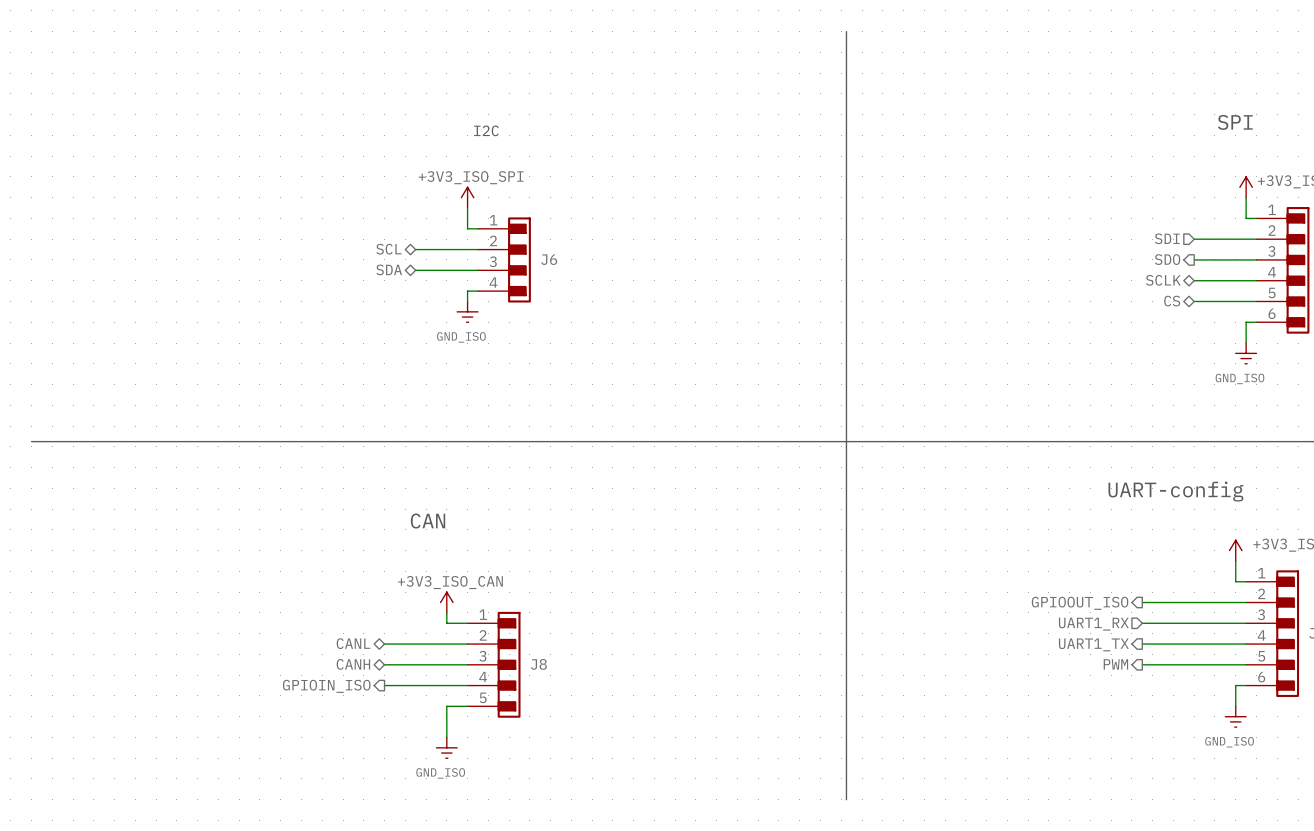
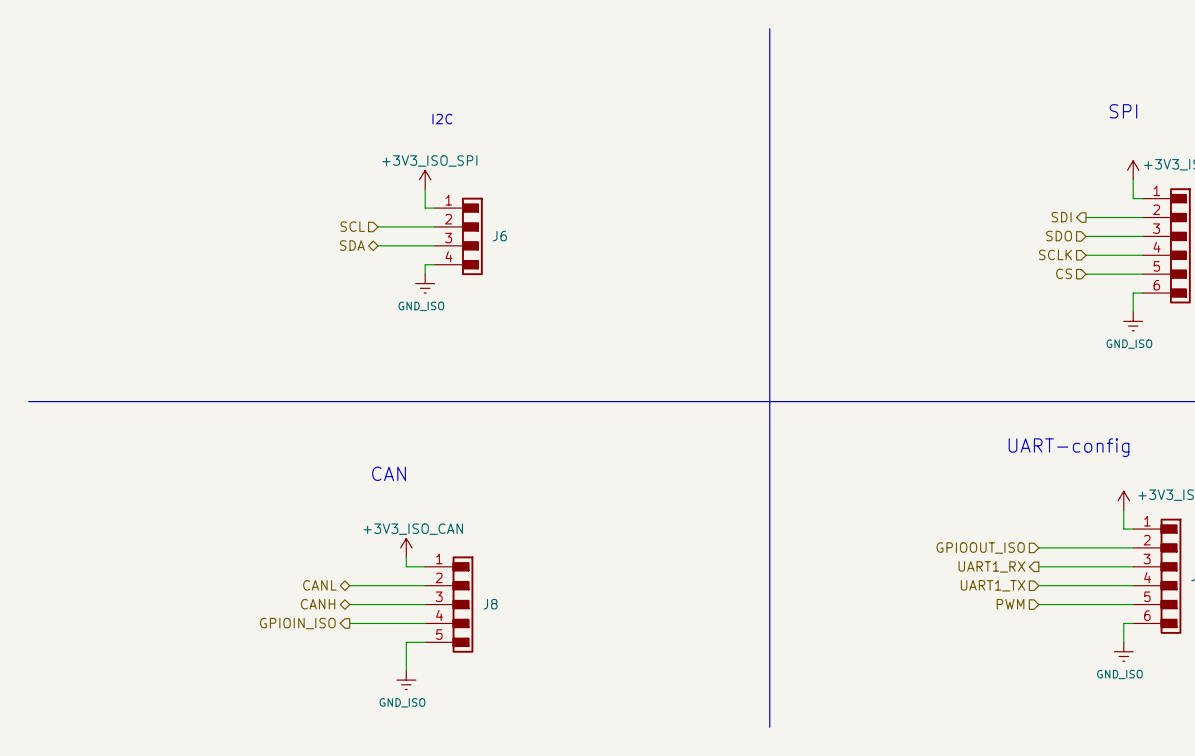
hierarchical label shape: input (1167, 238) -> output (1061, 217)
hierarchical label shape: bidirectional (388, 249) -> input (352, 226)
hierarchical label shape: output (1167, 259) -> input (1059, 236)
hierarchical label shape: bidirectional (1163, 280) -> input (1055, 254)
hierarchical label shape: bidirectional (1172, 301) -> input (1064, 273)
hierarchical label shape: output (1080, 603) -> input (980, 548)
hierarchical label shape: input (1093, 624) -> output (991, 566)
hierarchical label shape: output (1093, 644) -> input (993, 585)
hierarchical label shape: output (1115, 664) -> input (1010, 604)

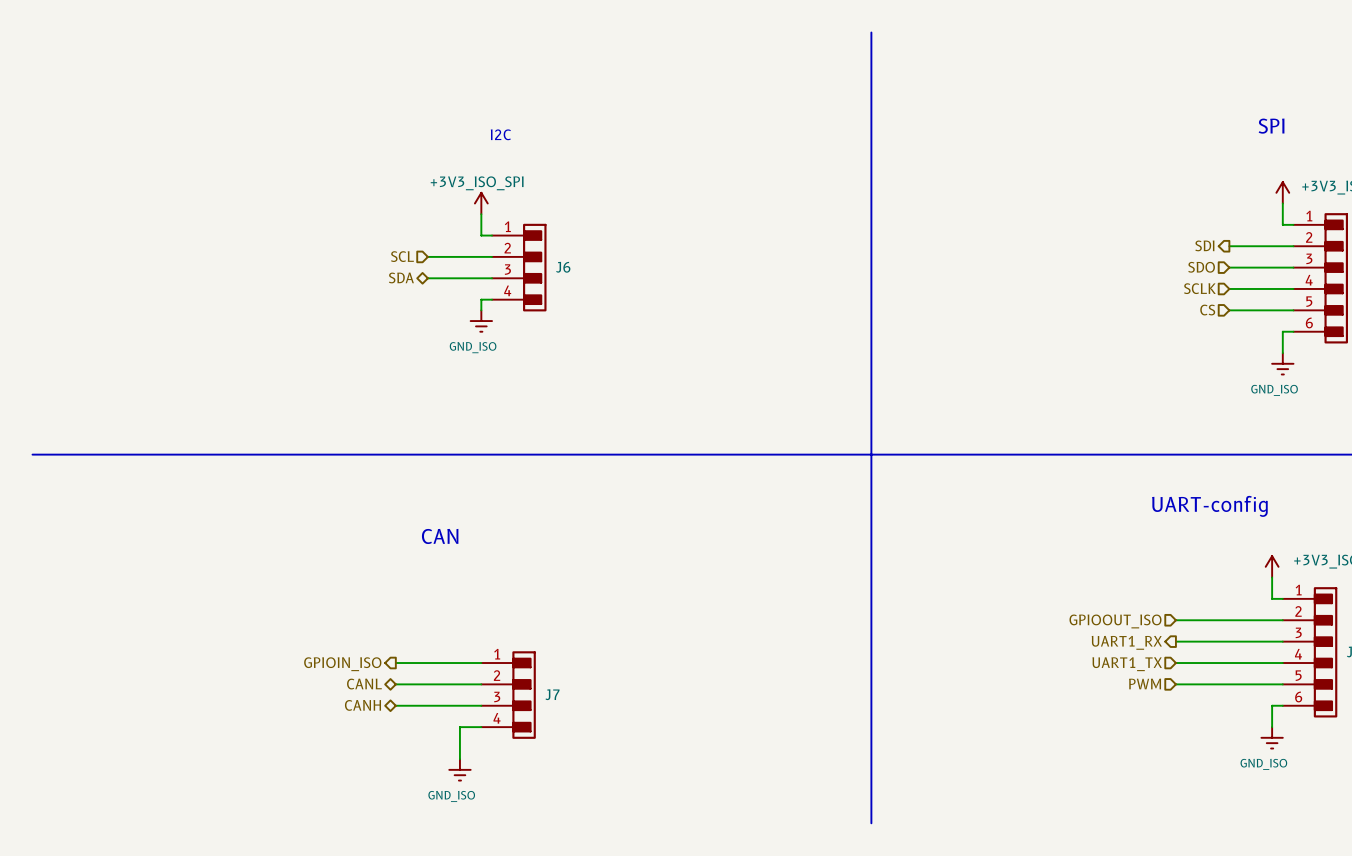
power symbol: +3V3_ISO_CAN (406, 547) -> none
wire: (406, 557) (406, 566) (425, 566) -> none
hierarchical label shape: bidirectional (319, 585) -> output (342, 664)
hierarchical label: CANL (319, 585) -> GPIOIN_ISO (342, 664)
hierarchical label: CANH (318, 604) -> CANL (364, 684)
J8: (449, 604) -> none
J7: none -> (508, 695)
hierarchical label shape: output (297, 623) -> bidirectional (362, 705)
hierarchical label: GPIOIN_ISO (297, 623) -> CANH (362, 705)

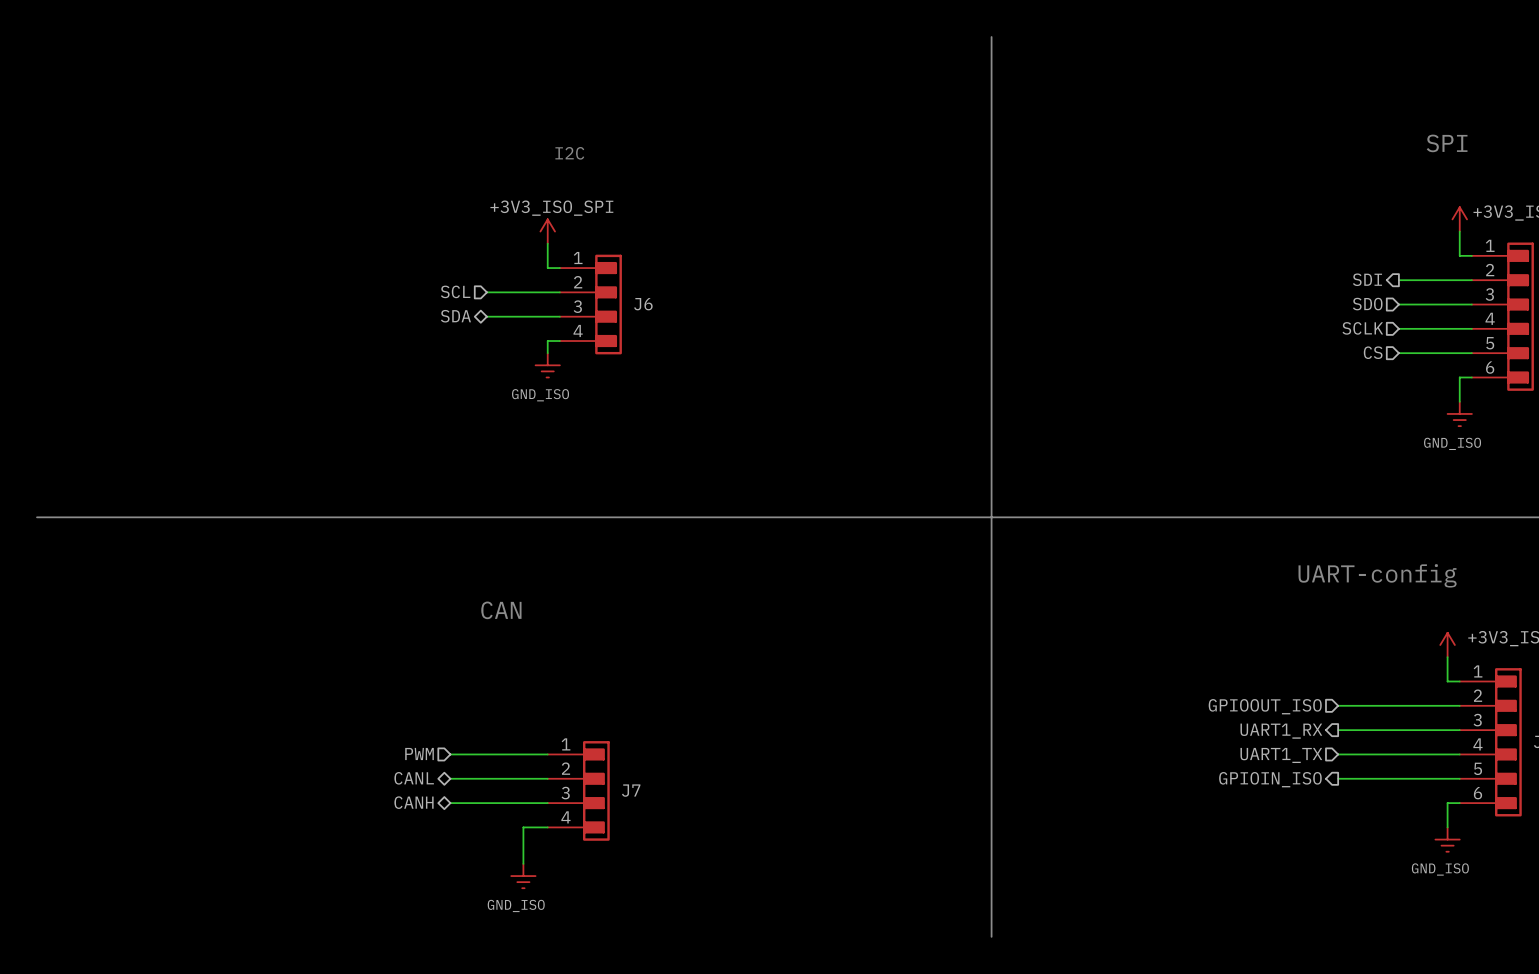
hierarchical label shape: output (342, 664) -> input (419, 754)
hierarchical label: GPIOIN_ISO (342, 664) -> PWM (419, 754)
hierarchical label shape: input (1145, 683) -> output (1270, 779)
hierarchical label: PWM (1145, 683) -> GPIOIN_ISO (1270, 779)

